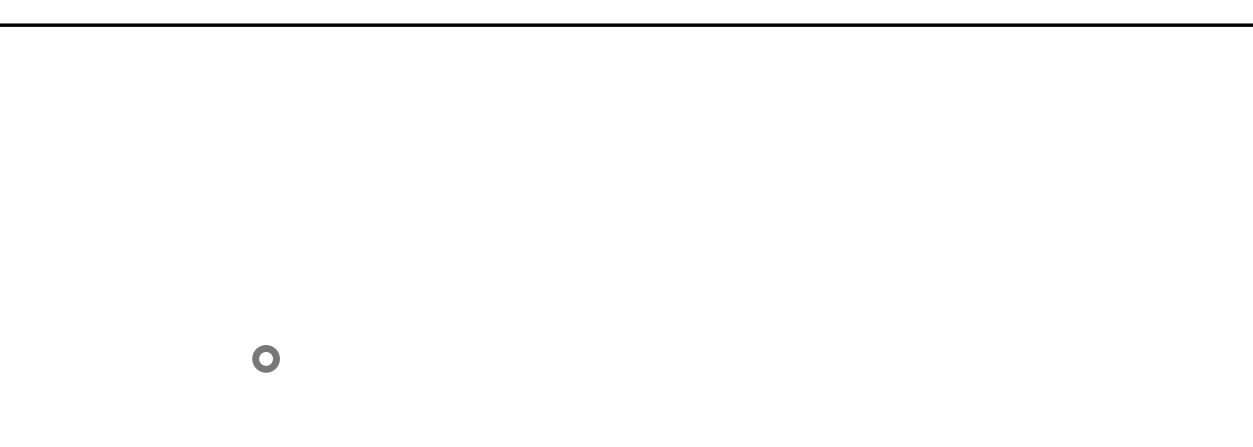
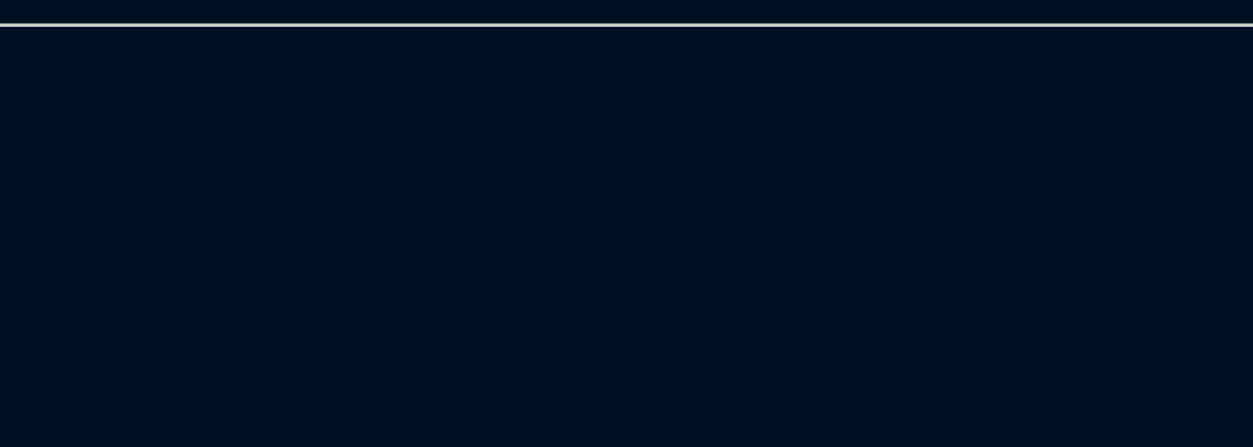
via: (266, 358) -> none

